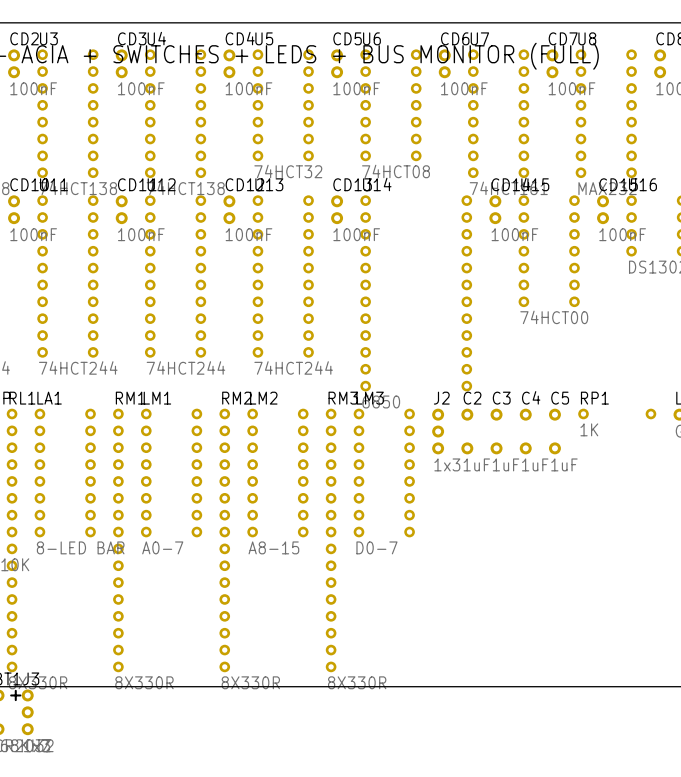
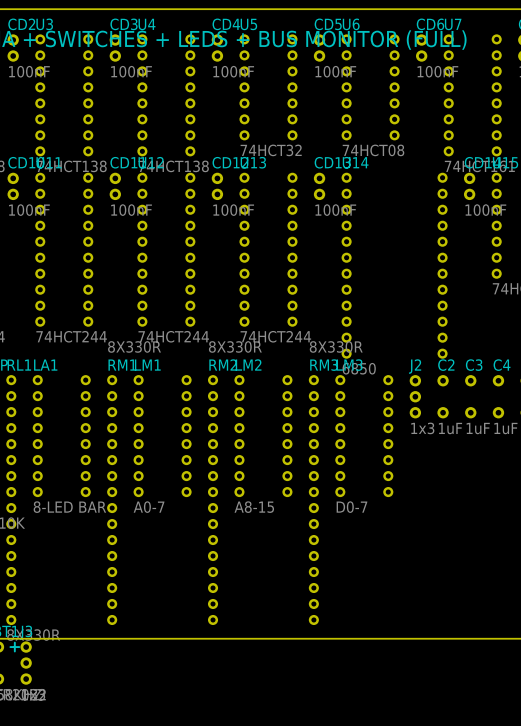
RM1 value position: 8X330R (144, 682) -> 8X330R (134, 346)
RM2 value position: 8X330R (250, 682) -> 8X330R (235, 346)
RM3 value position: 8X330R (357, 682) -> 8X330R (336, 346)

